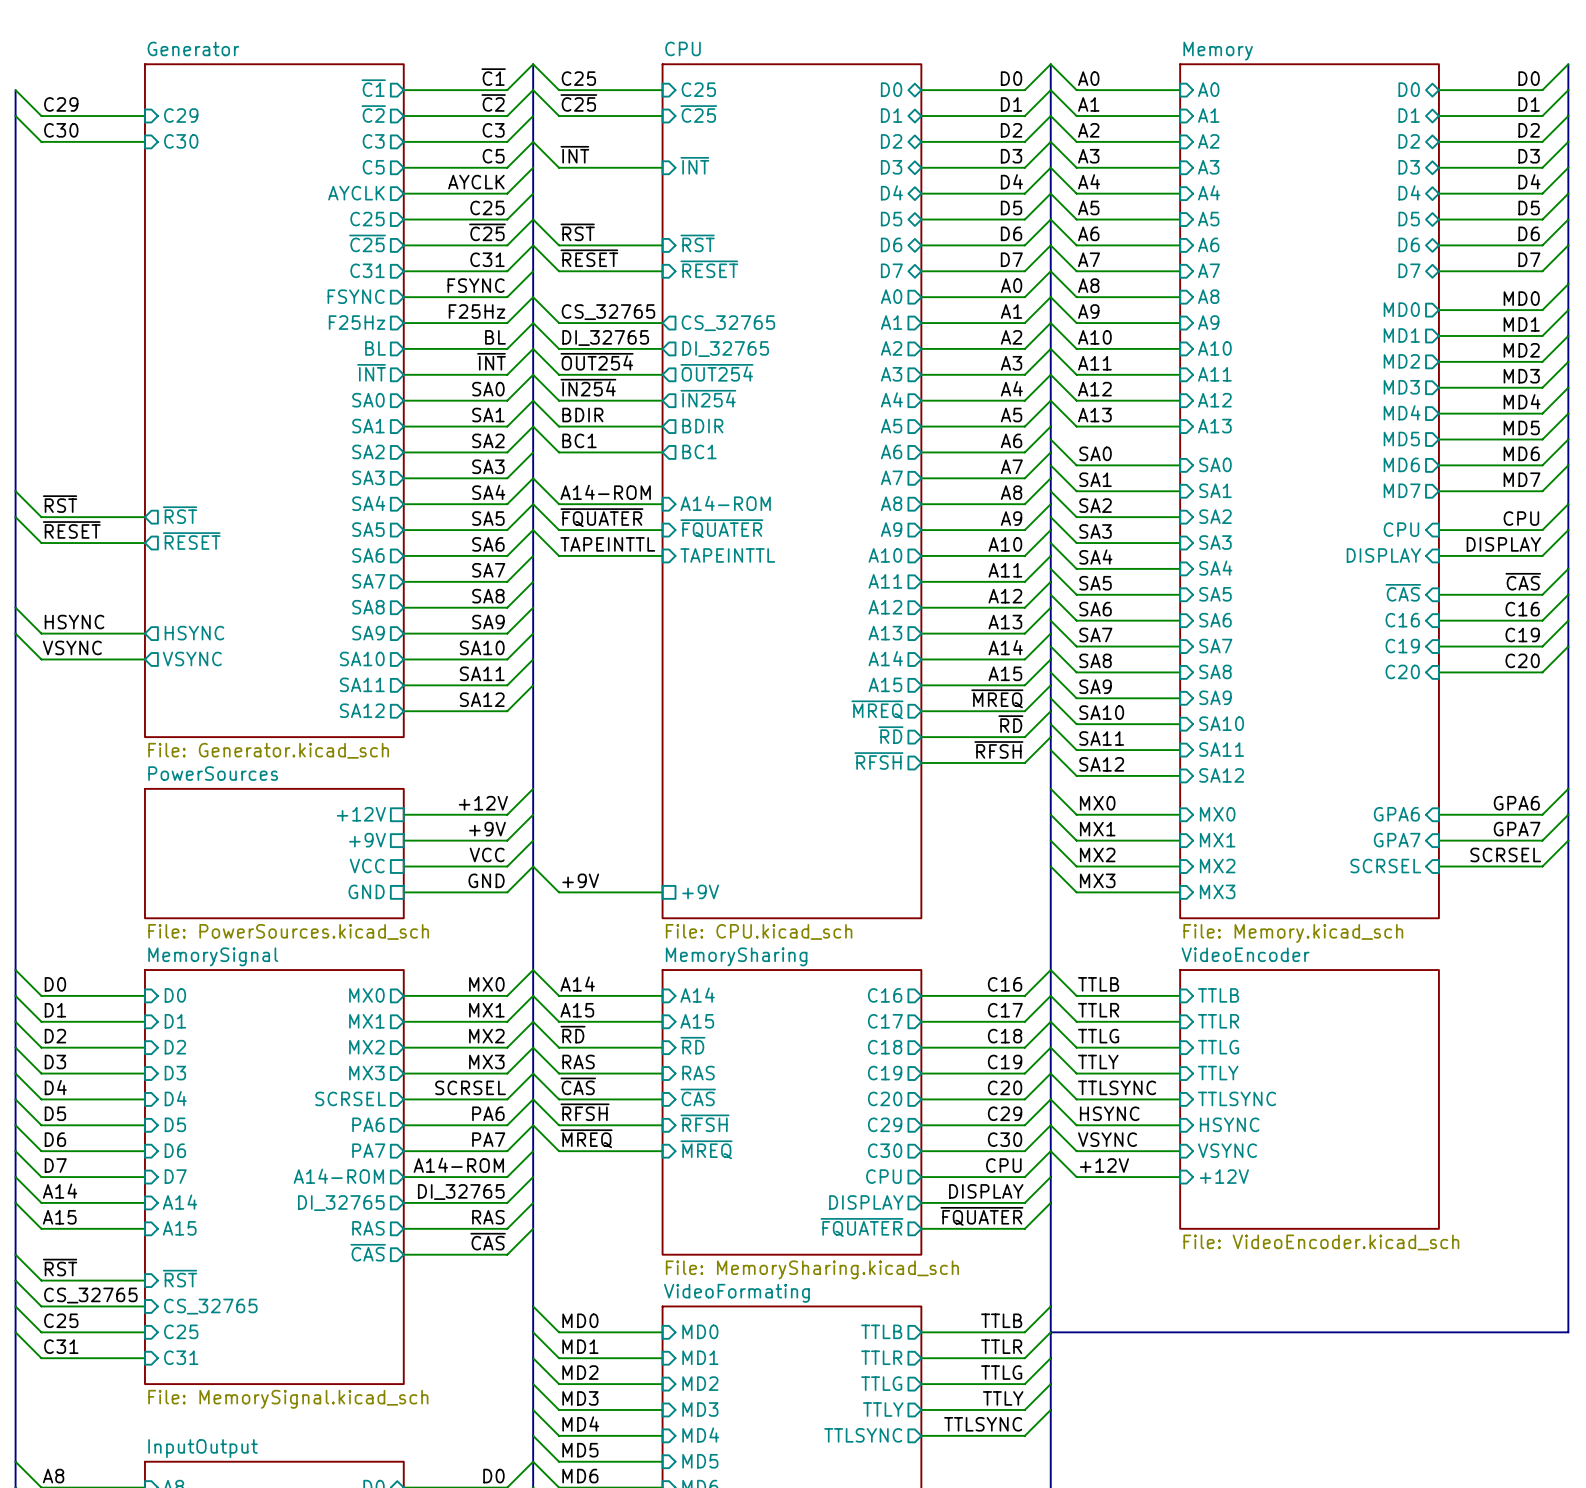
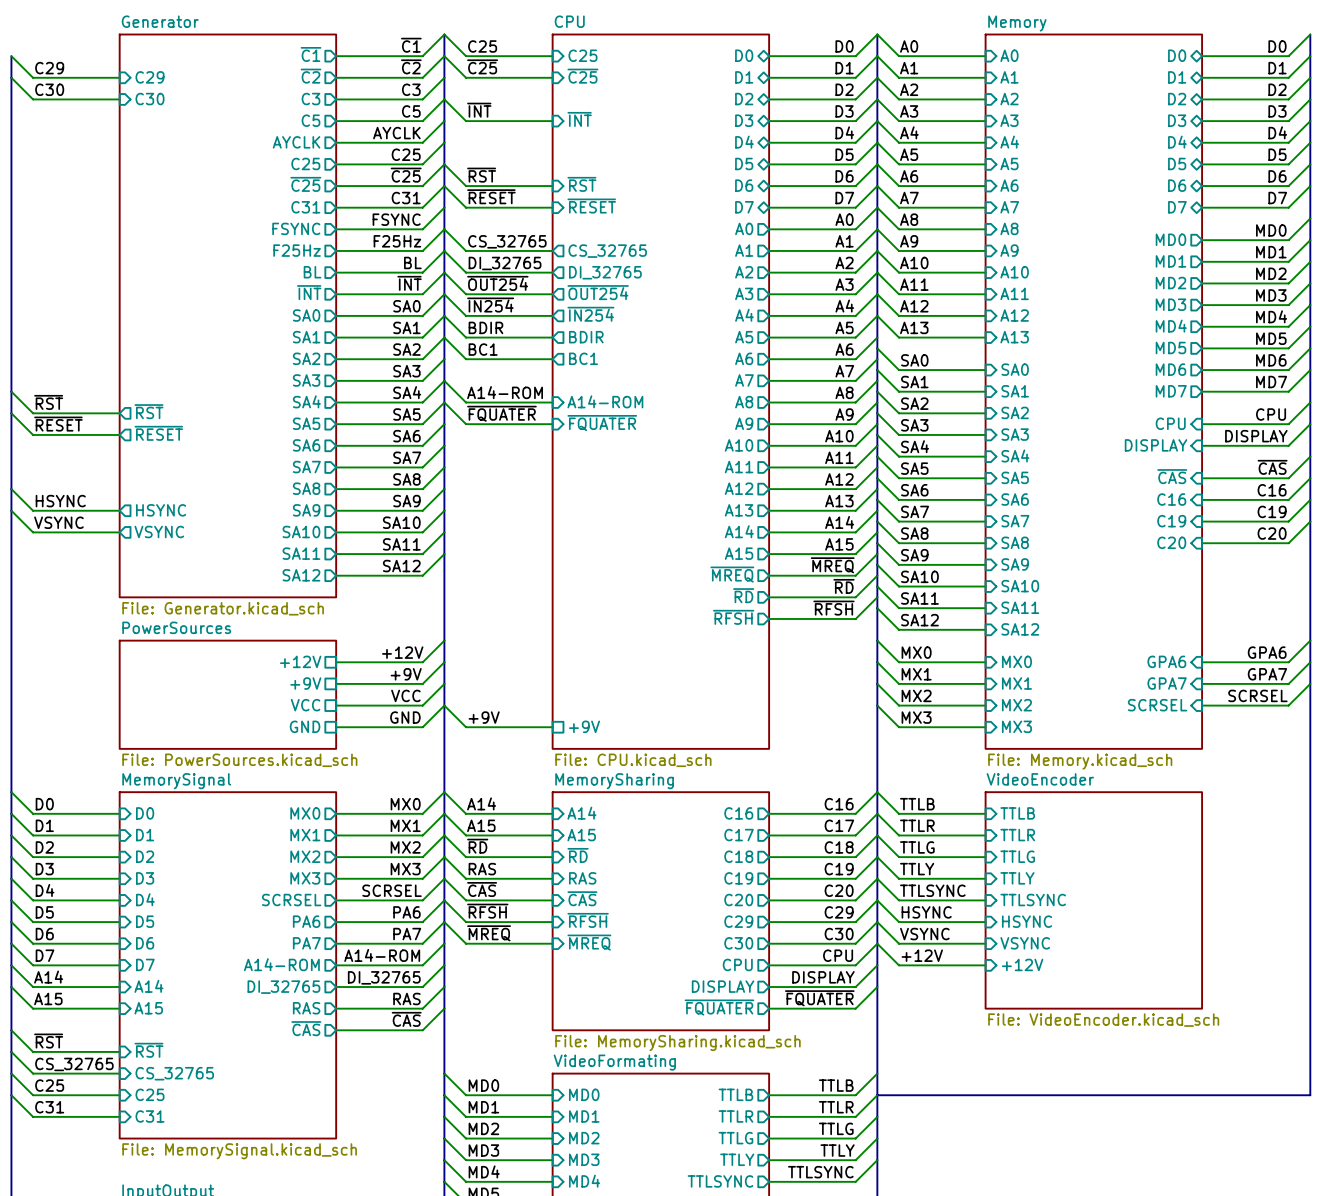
wire: (533, 530) (559, 555) (662, 555) -> none
label: TAPEINTTL (607, 544) -> none
sheet pin: TAPEINTTL (727, 555) -> none

